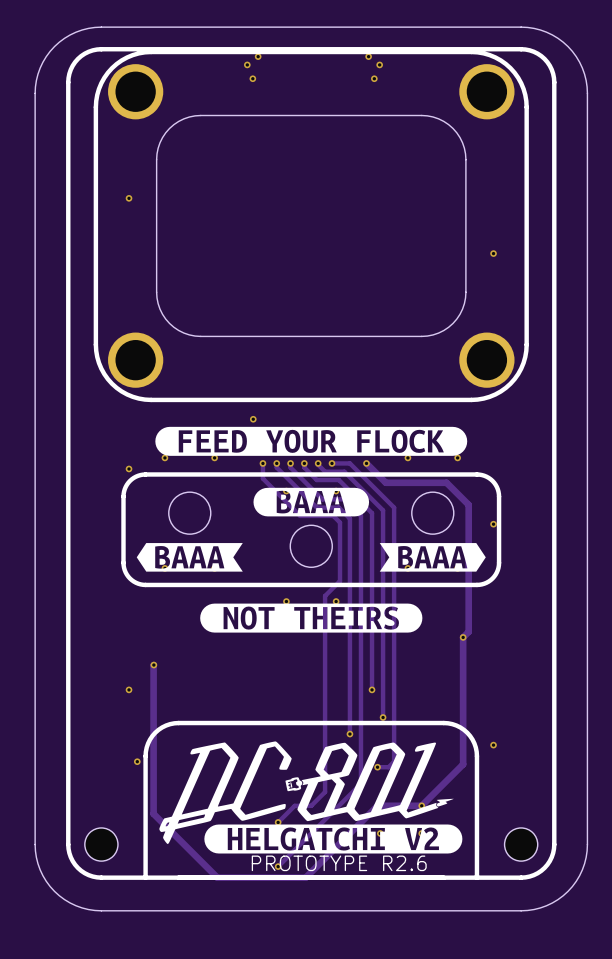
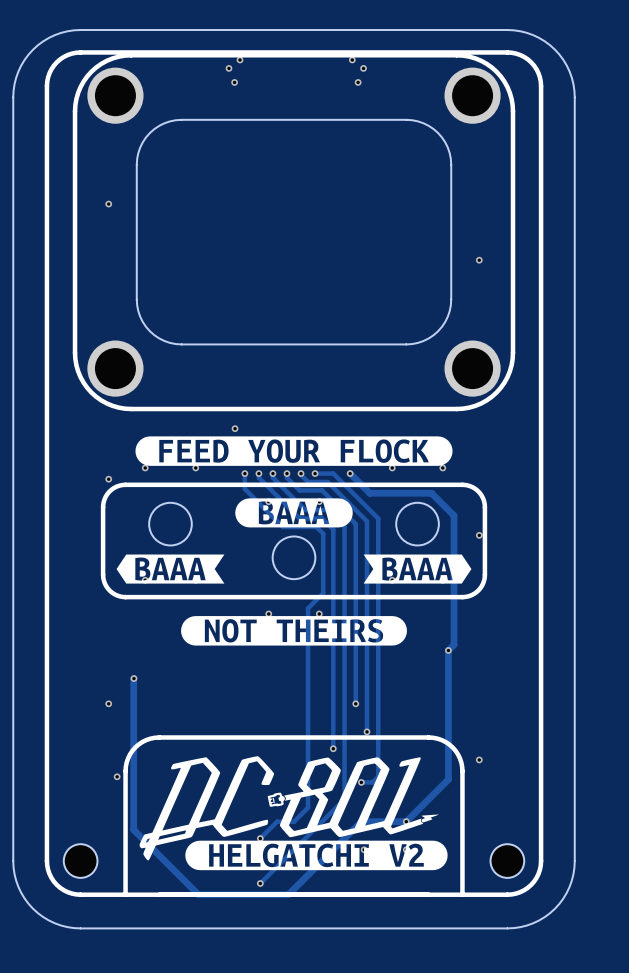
text: PROTOTYPE R2.6 (339, 863) -> none

